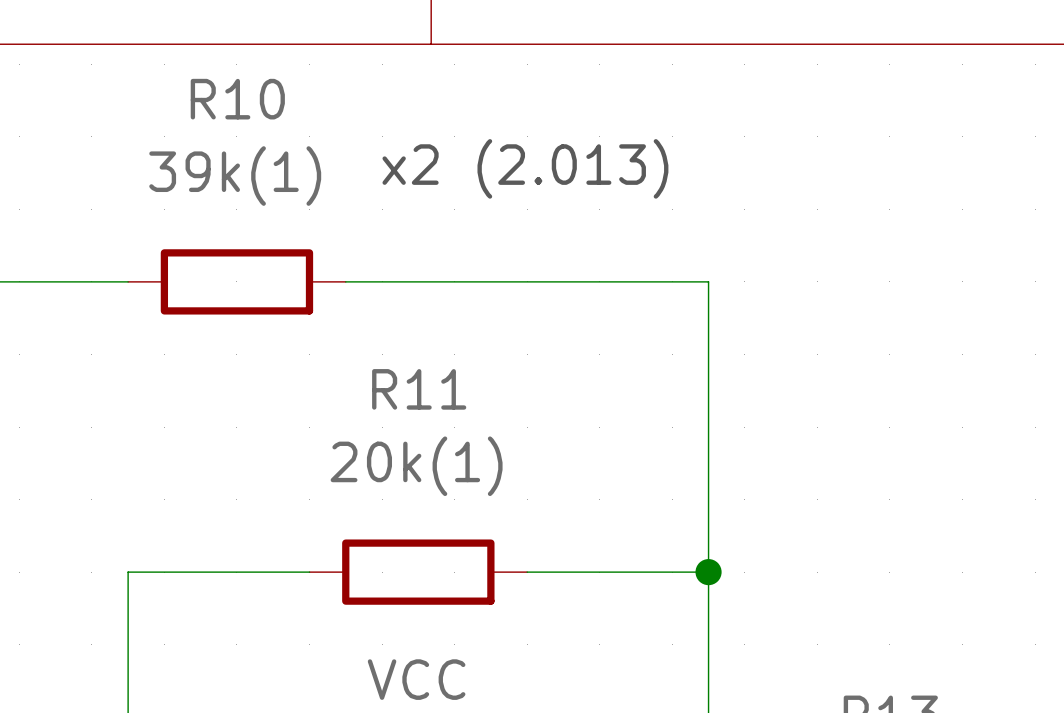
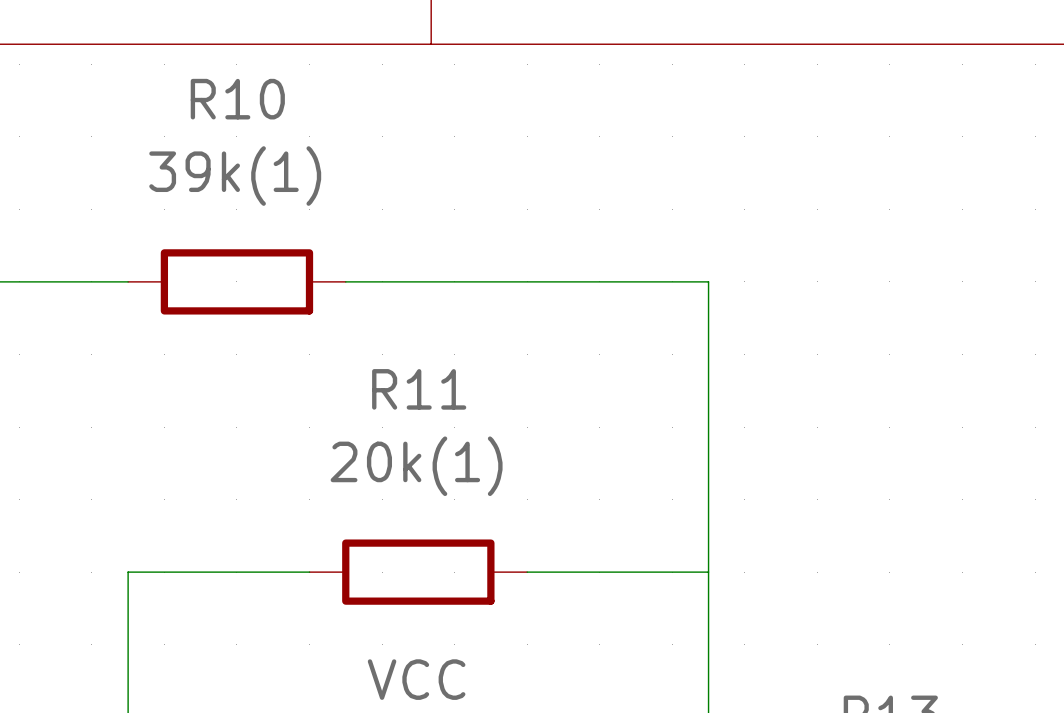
text: x2 (2.013) (525, 168) -> none
junction: (708, 572) -> none

